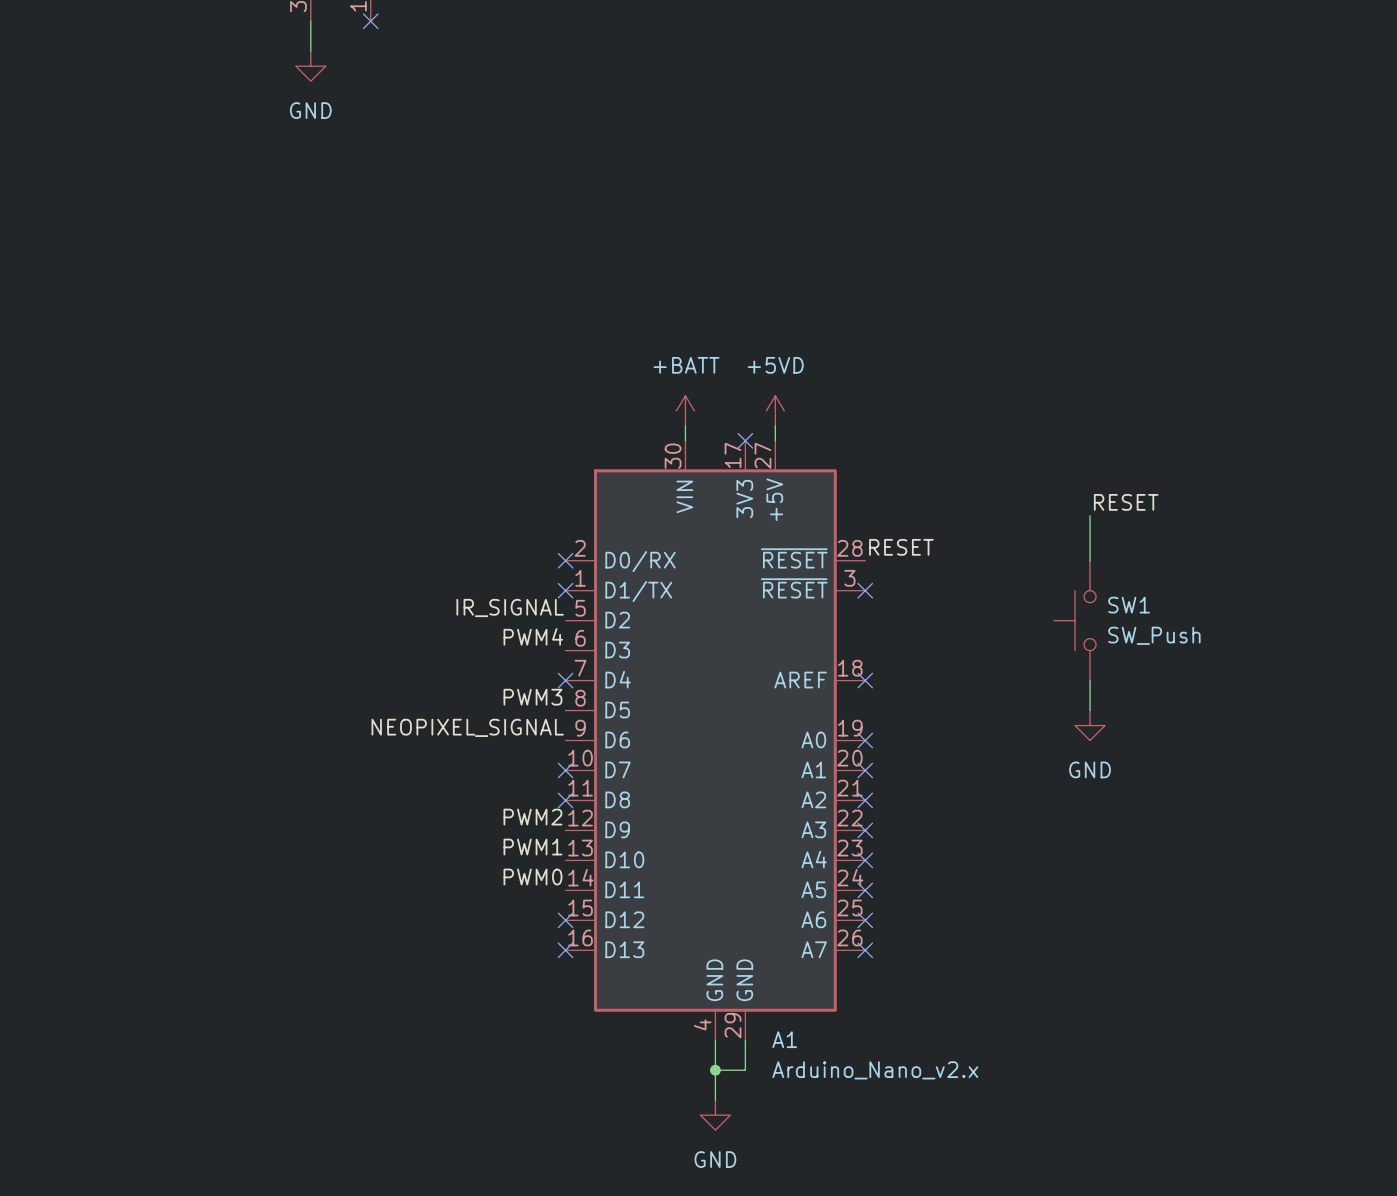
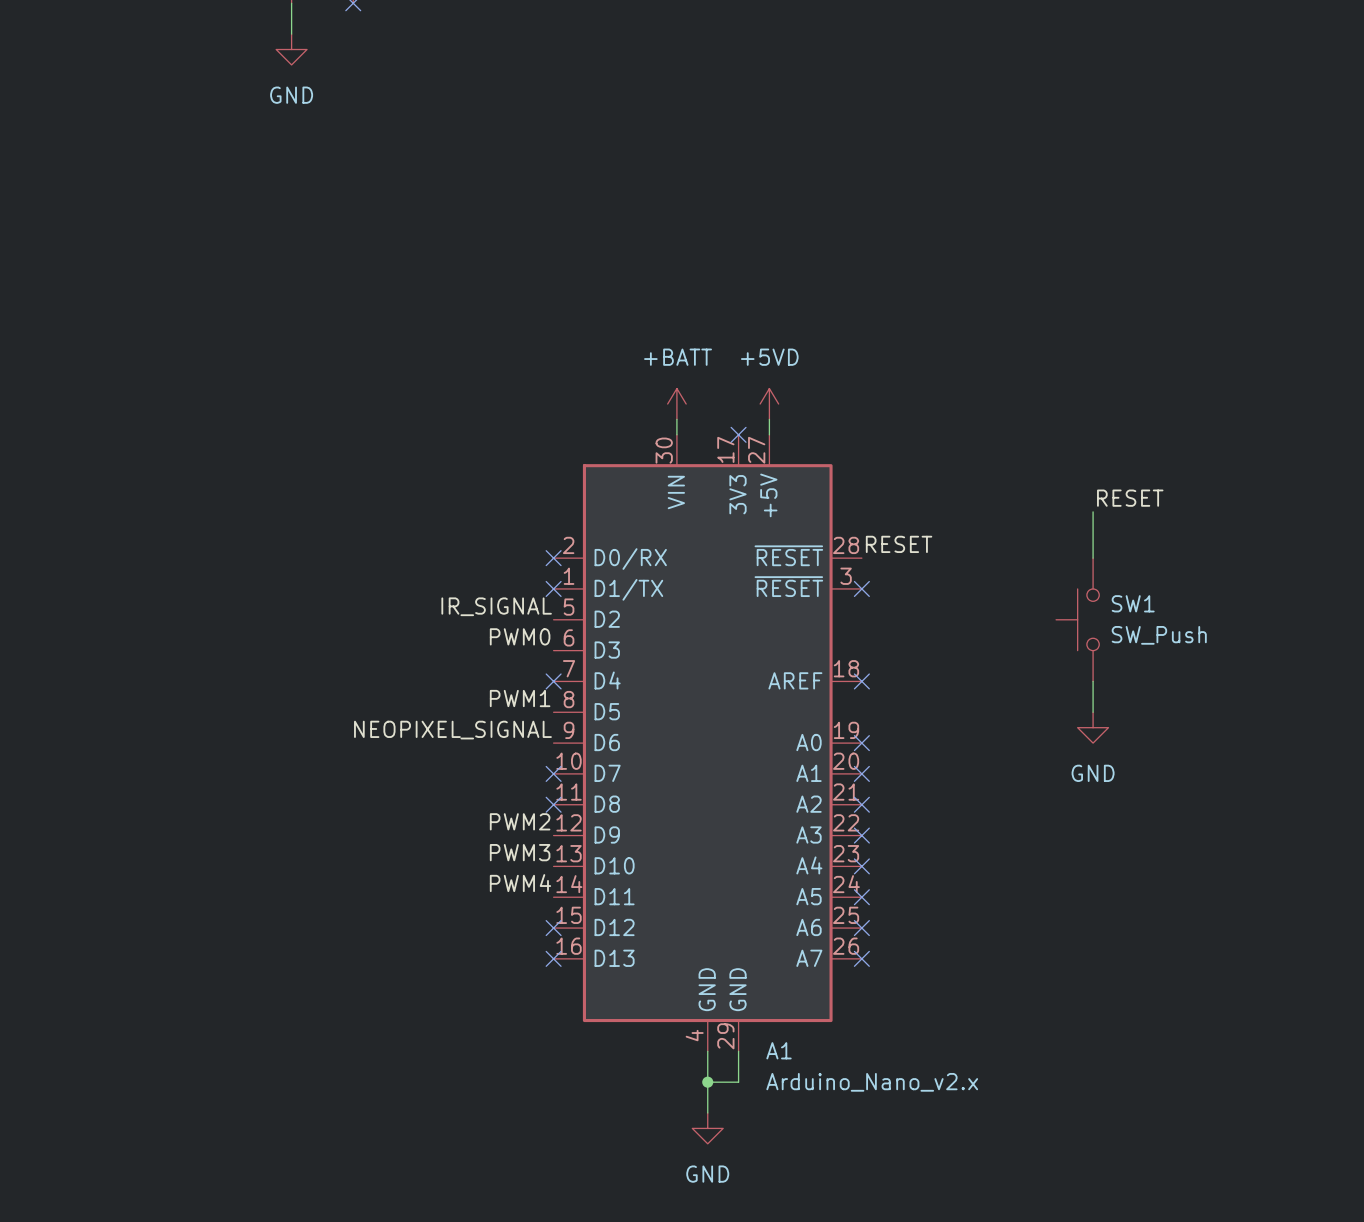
label: PWM4 (533, 636) -> PWM0 (520, 636)
label: PWM3 (532, 697) -> PWM1 (520, 698)
label: PWM1 (532, 847) -> PWM3 (520, 852)
label: PWM0 (532, 877) -> PWM4 (520, 883)

